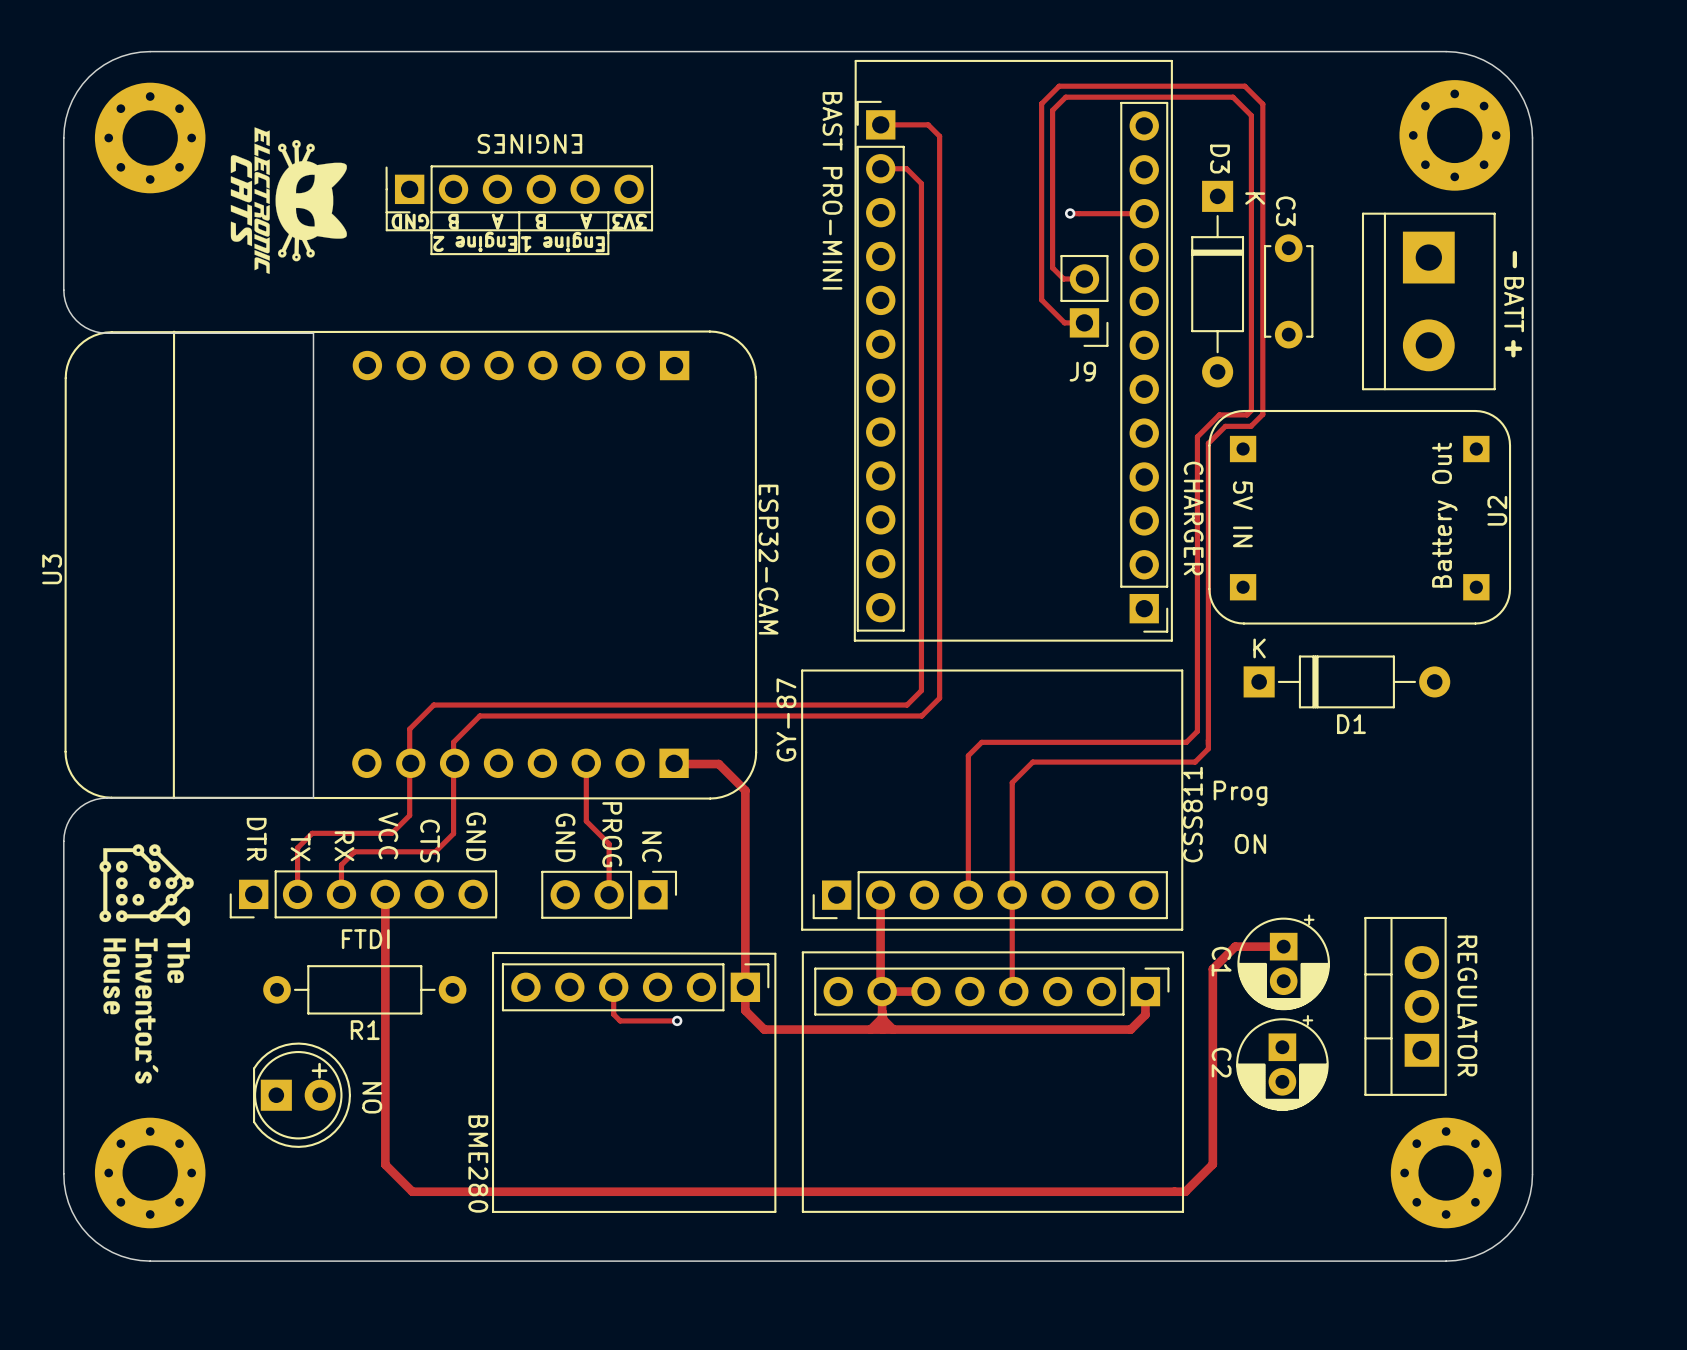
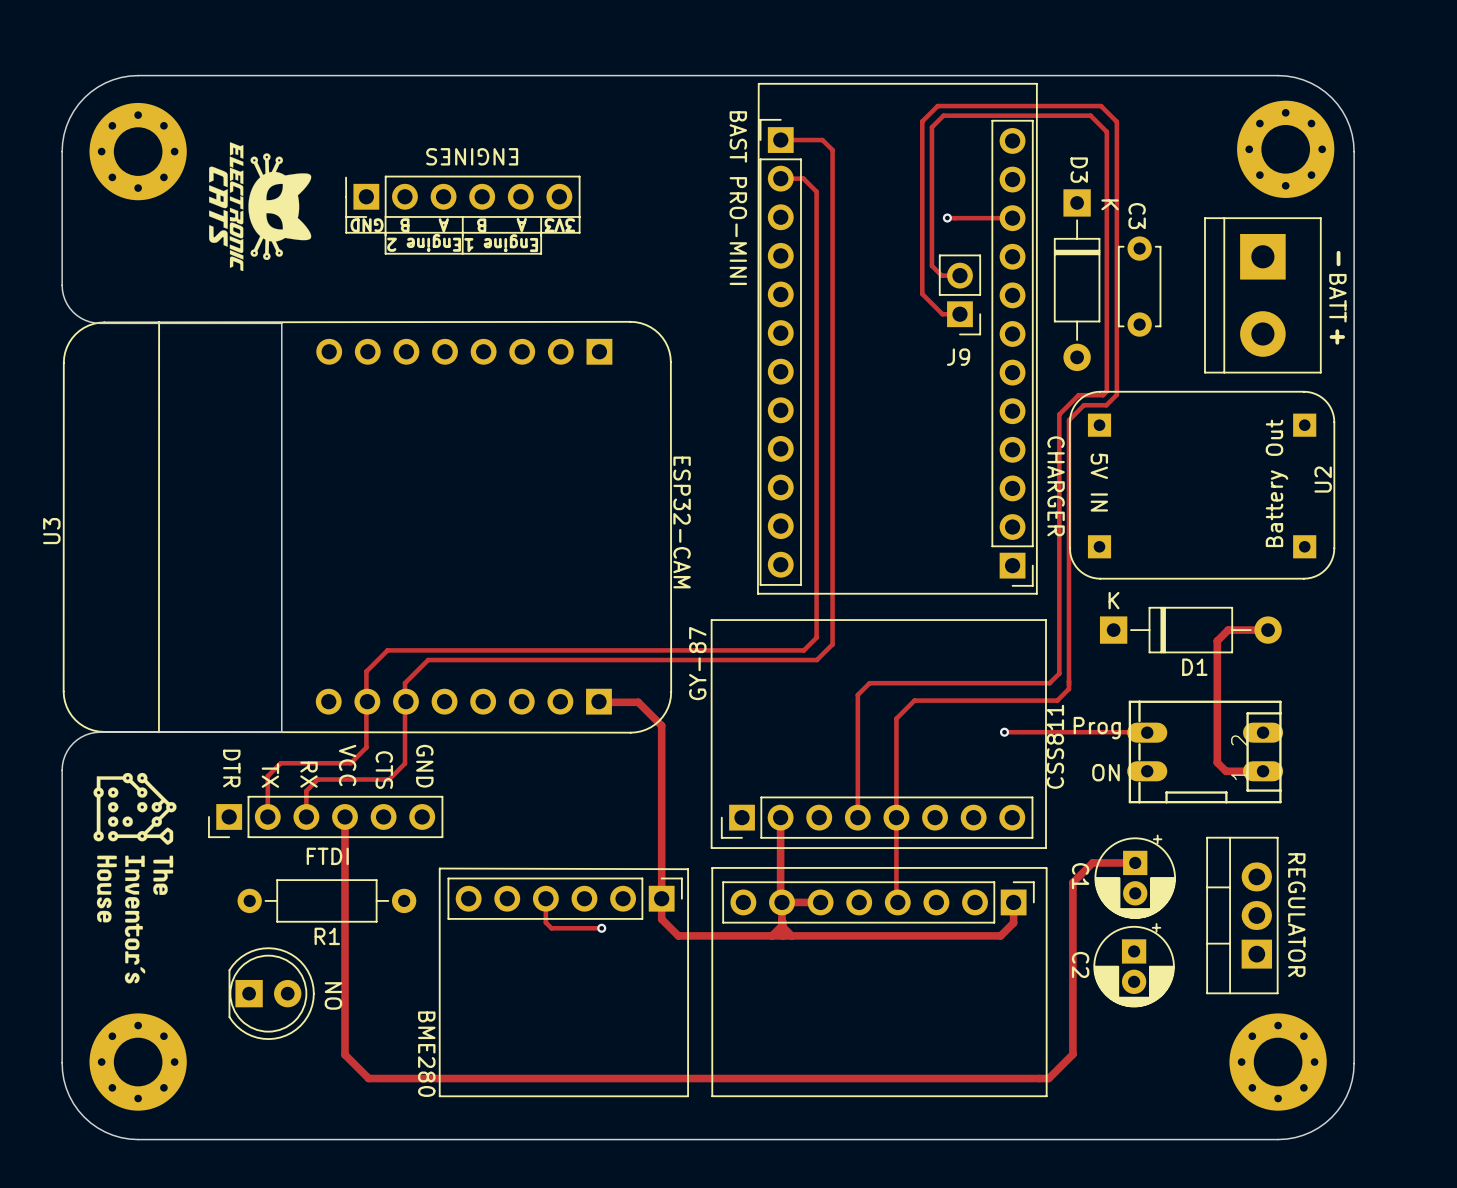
track: none -> (1268, 630) (1228, 630) (1217, 641) (1217, 762) (1225, 771) (1263, 771)
track: (586, 763) (586, 821) (609, 844) (609, 894) -> none
track: none -> (1004, 732) (1147, 732)
via: none -> (1004, 732)
part: none -> (1205, 751)
text: PROG (612, 834) -> none
text: GND (565, 837) -> none
text: NC (651, 846) -> none
part: (609, 894) -> none
text: + (319, 1070) -> none

